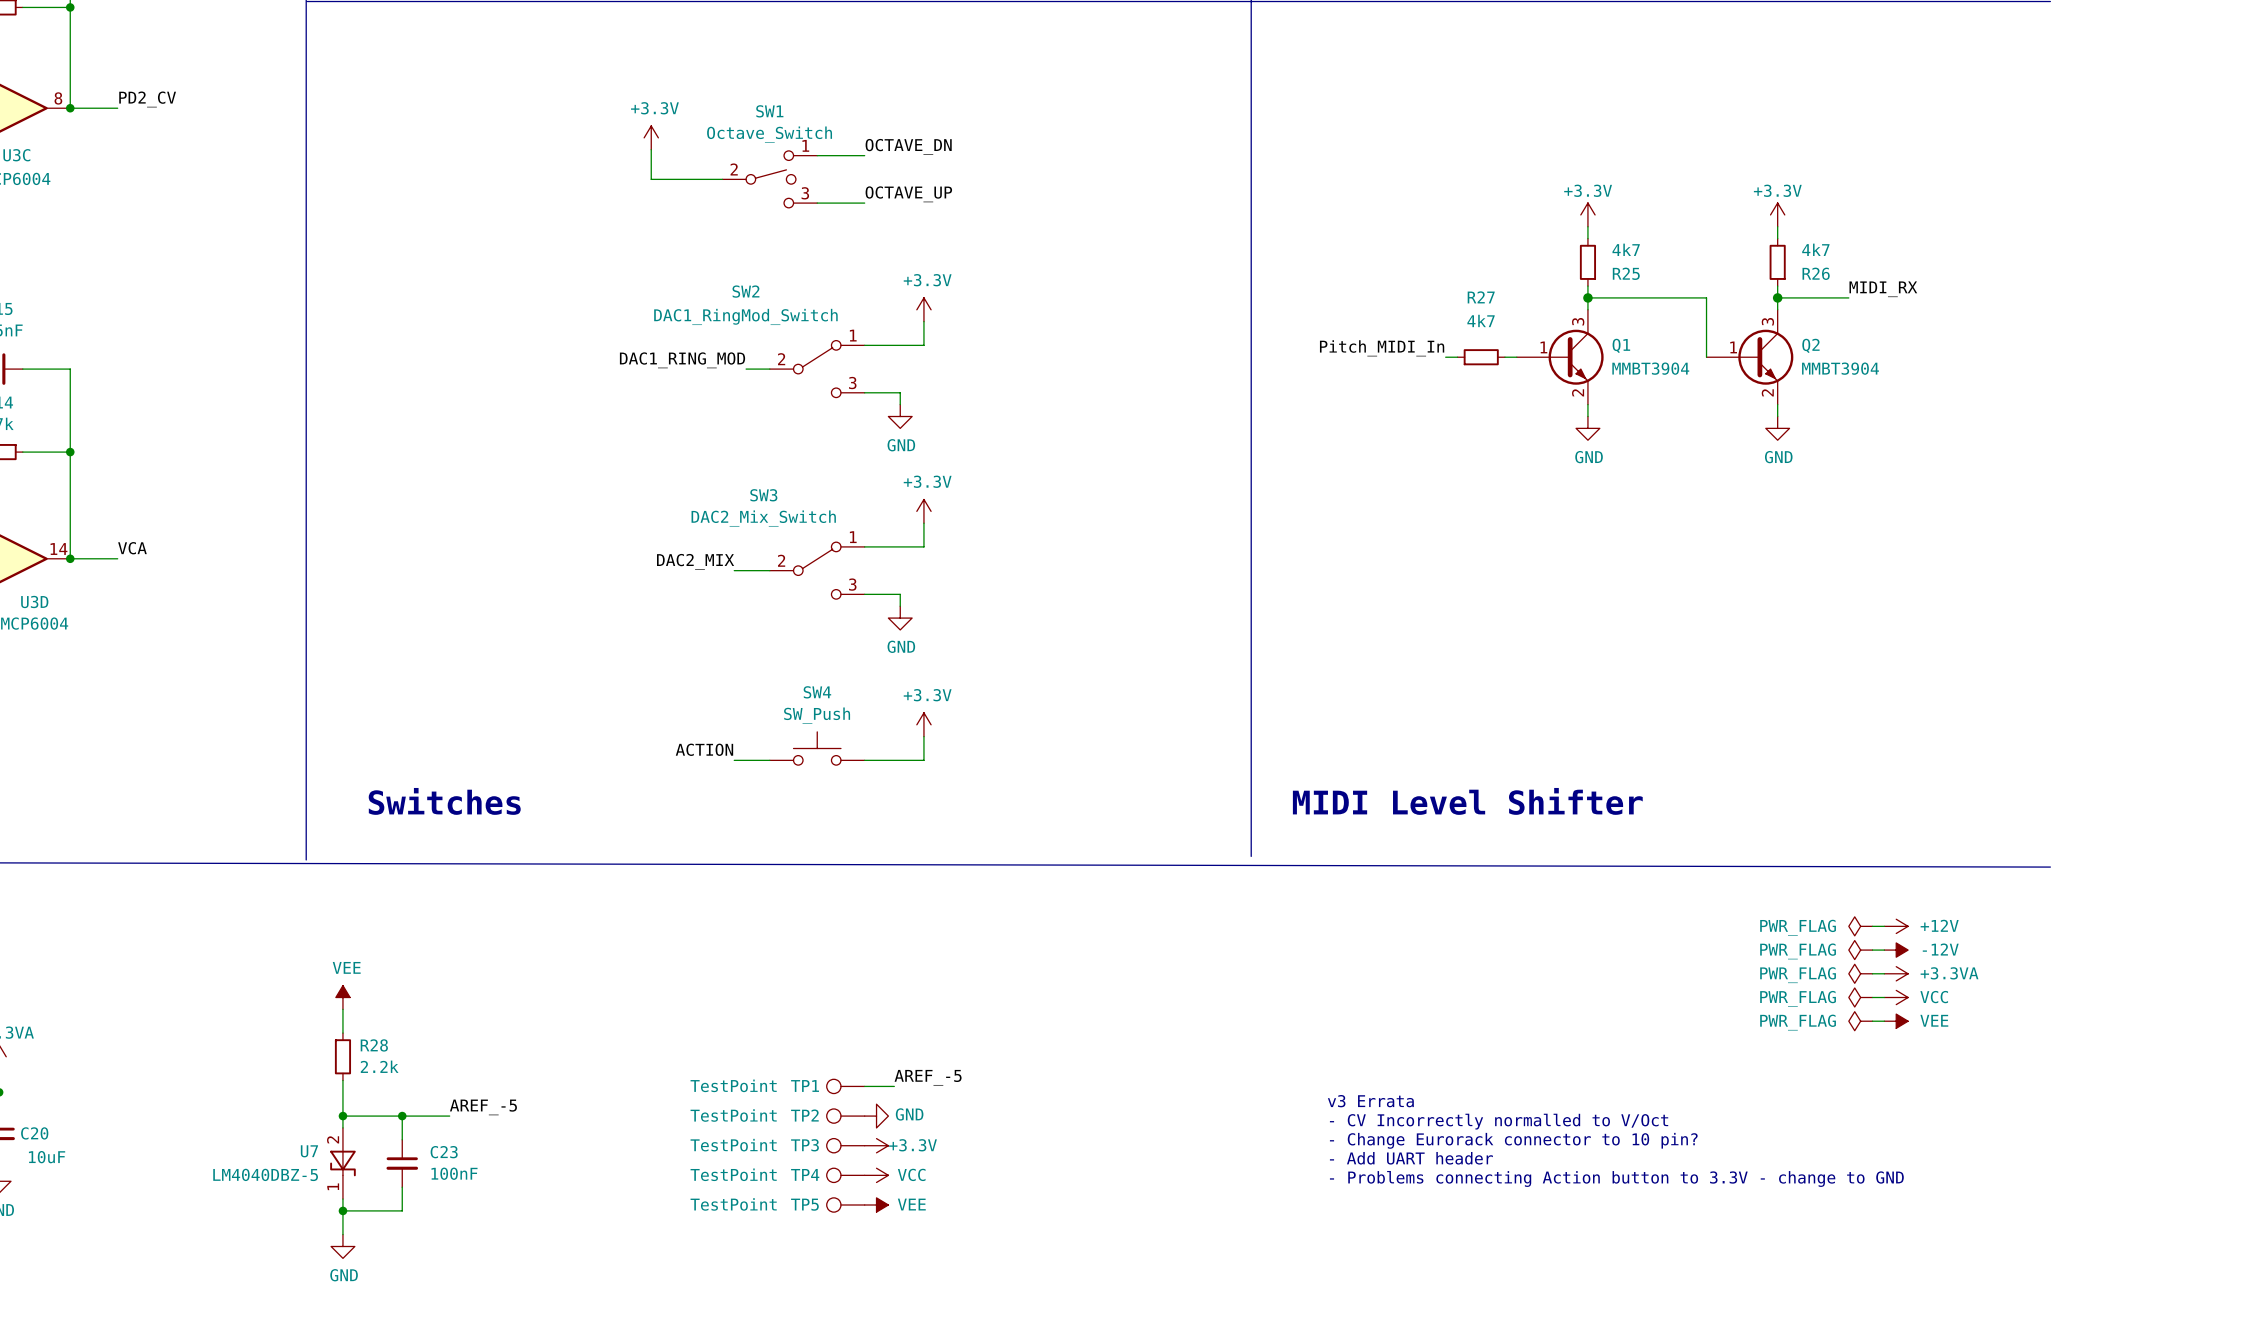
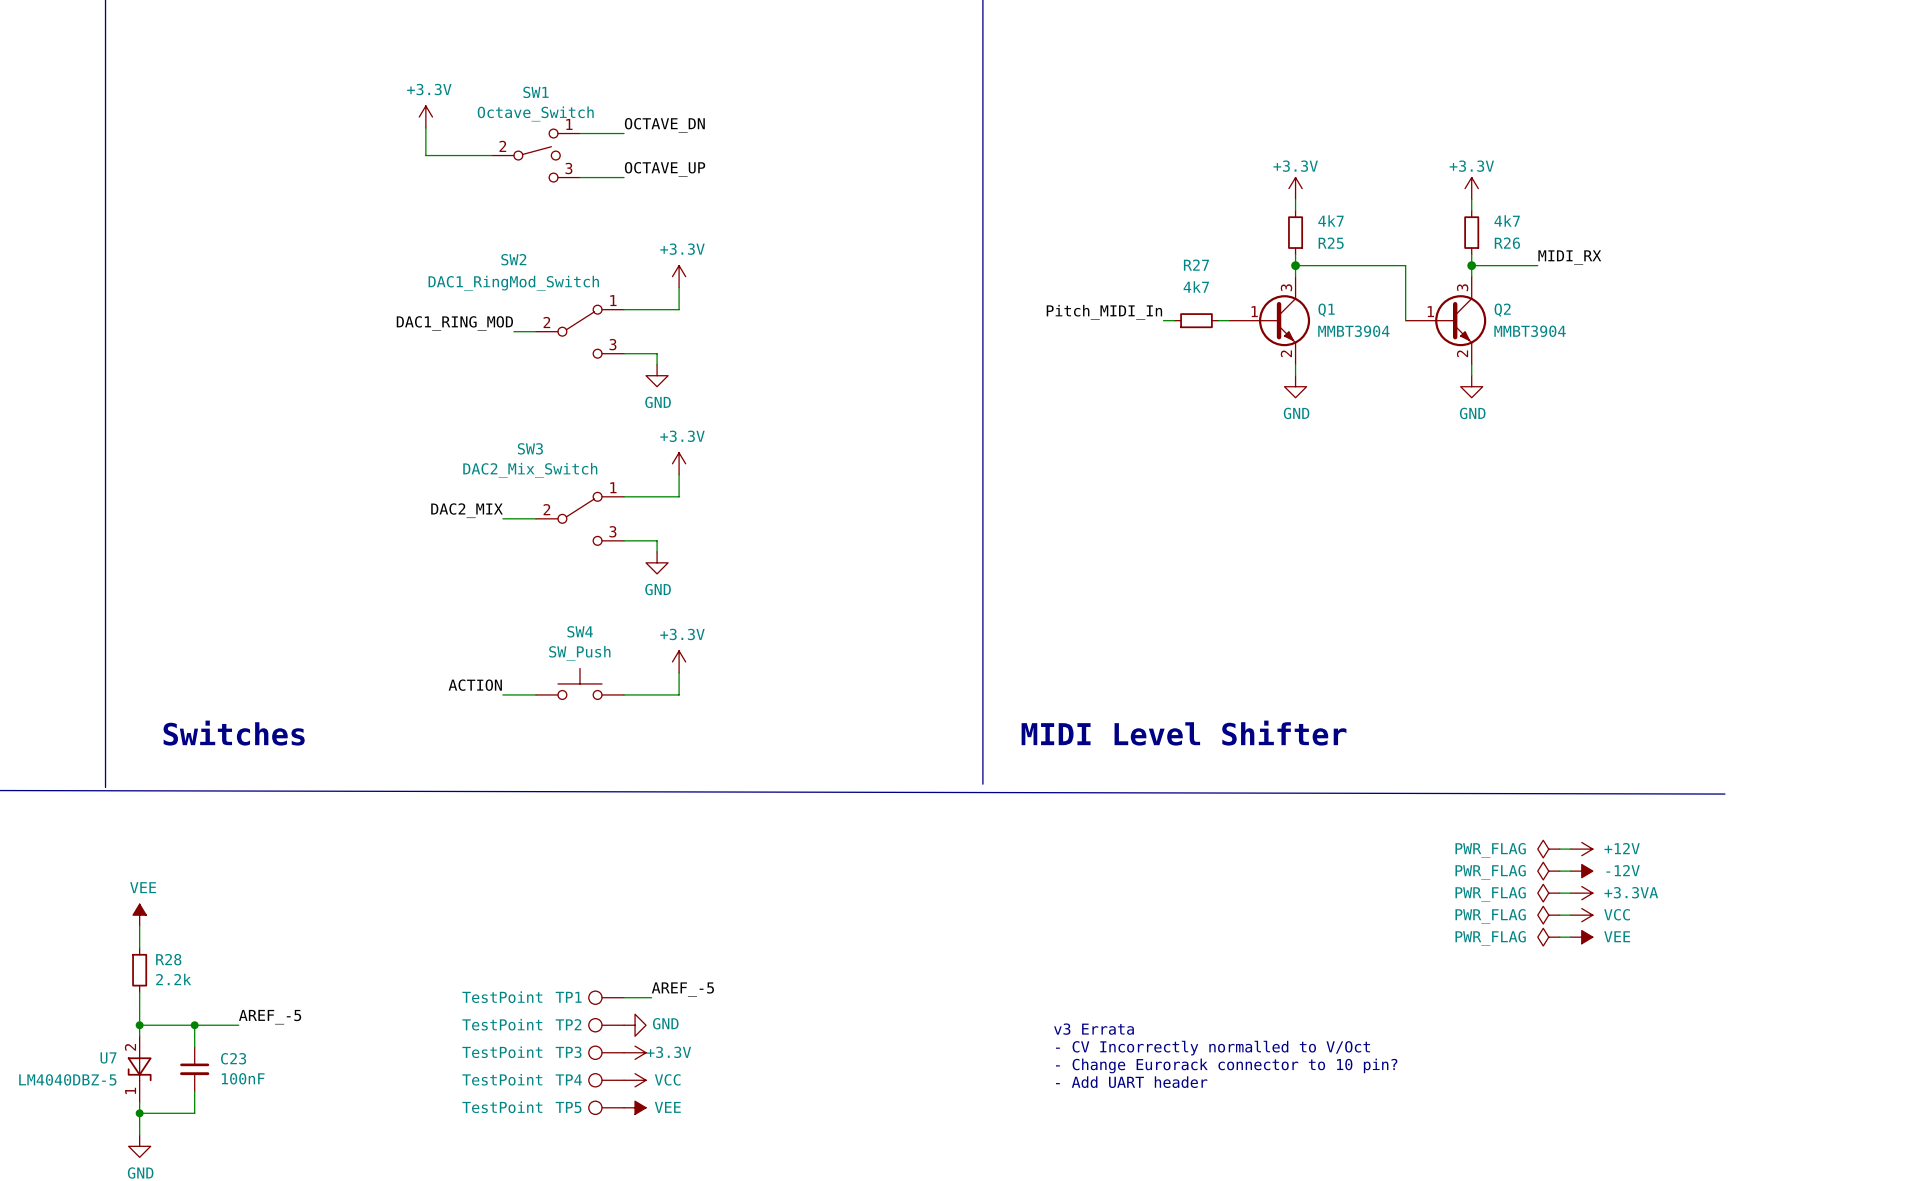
text: v3 Errata (1370, 1101) -> none
text: - CV Incorrectly normalled to V/Oct (1499, 1121) -> v3 Errata (1094, 1029)
text: - Change Eurorack connector to 10 pin? (1513, 1140) -> - CV Incorrectly normalled to V/Oct (1213, 1048)
text: - Add UART header (1411, 1158) -> - Change Eurorack connector to 10 pin? (1226, 1065)
text: - Problems connecting Action button to 3.3V - change to GND (1616, 1178) -> - Add UART header (1131, 1082)

